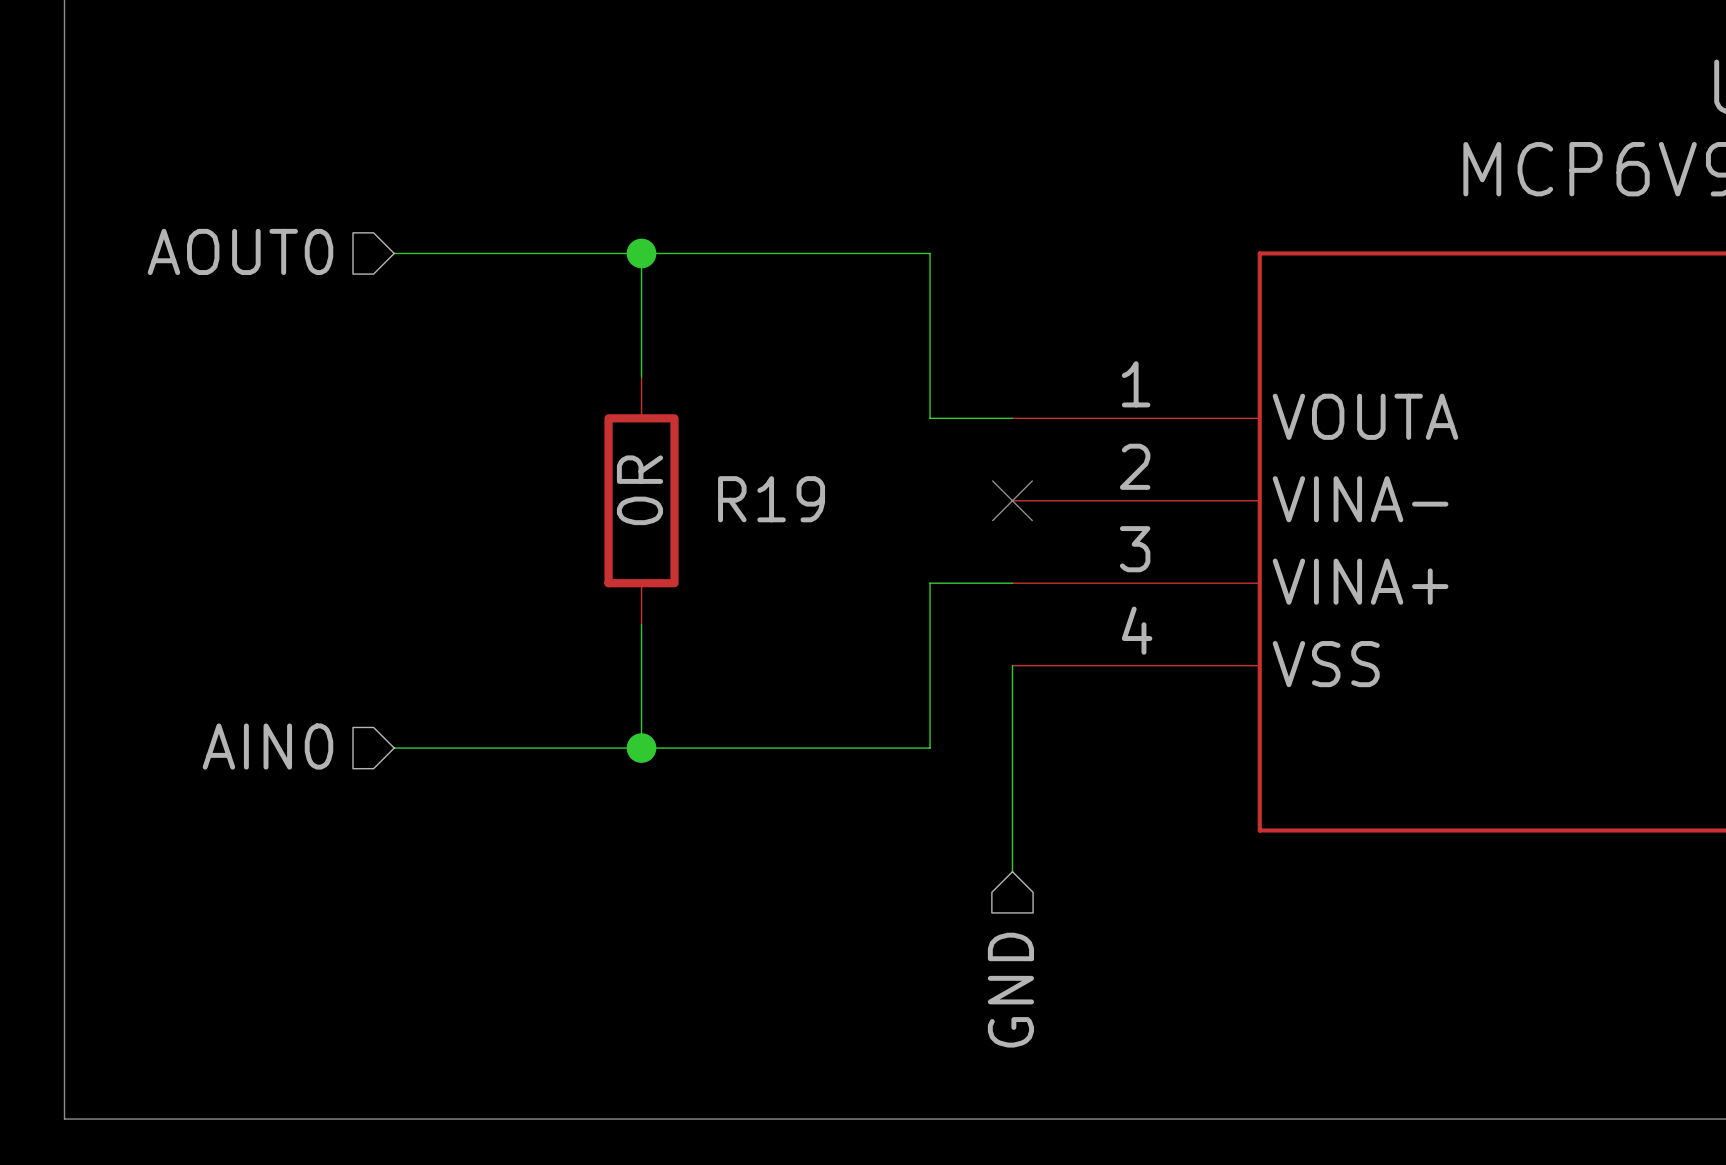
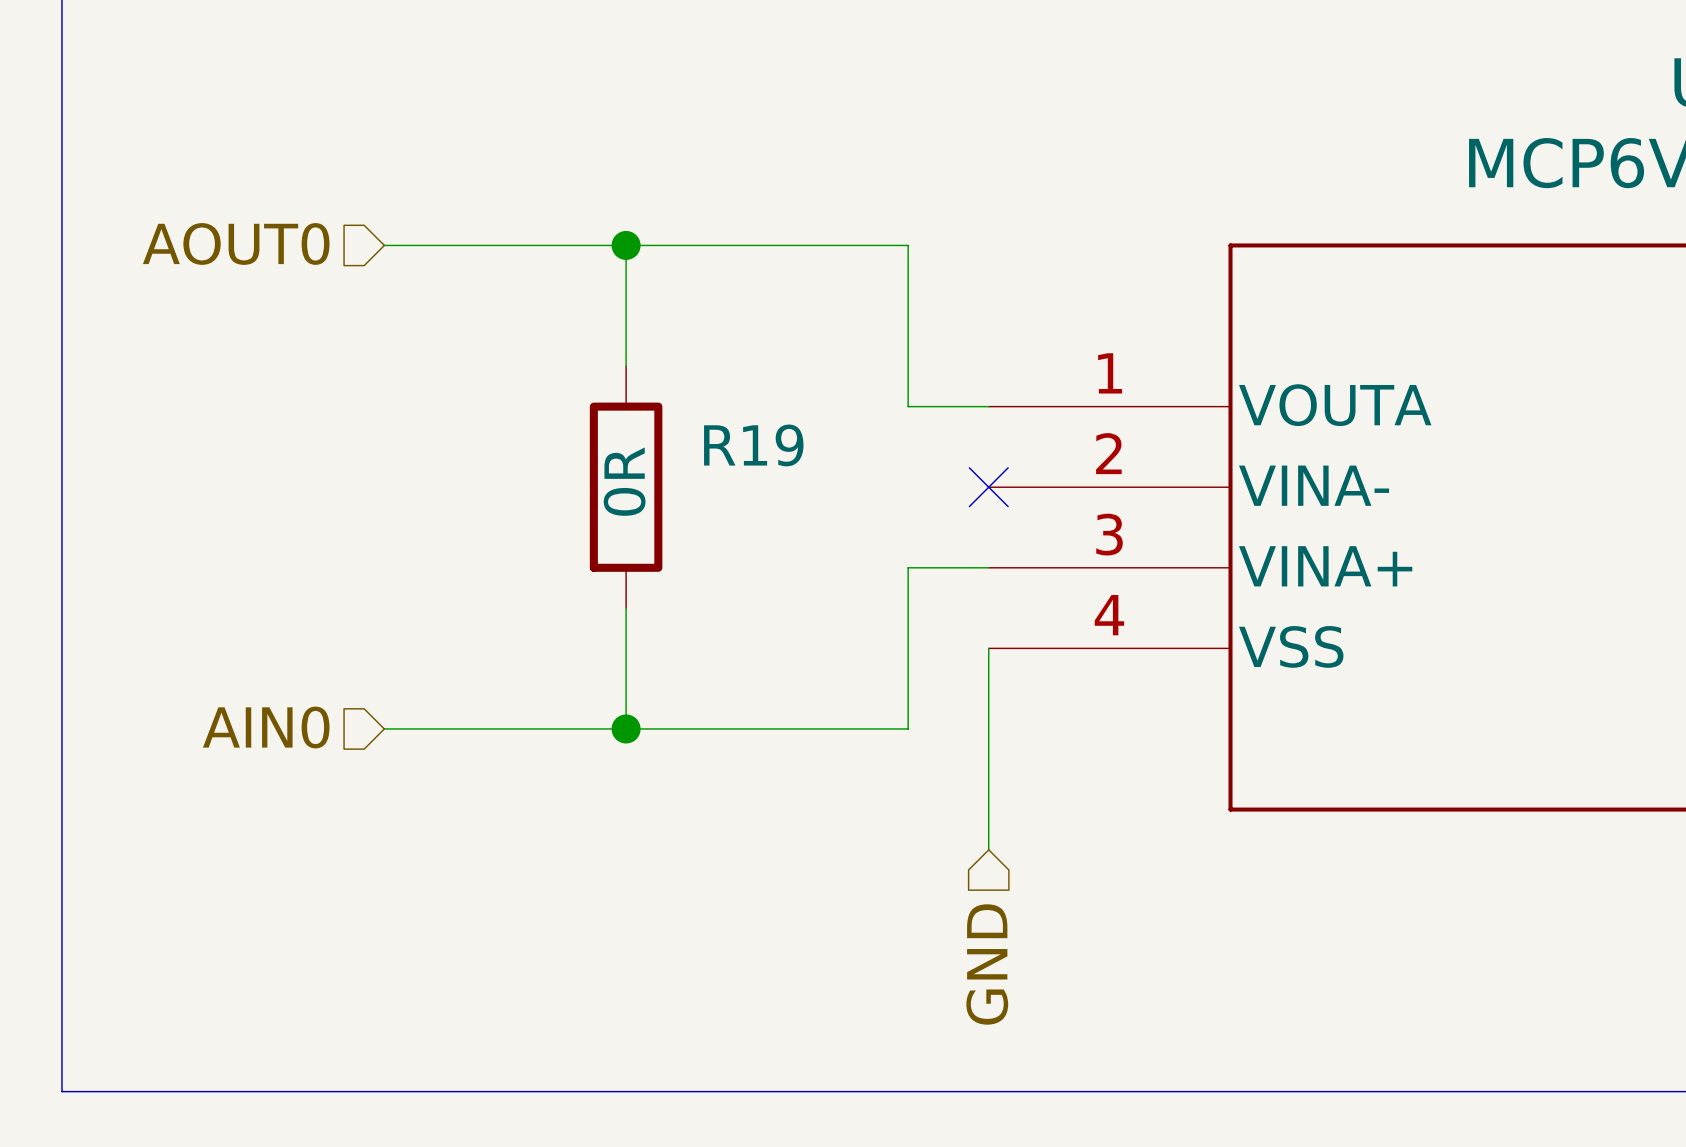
R19 name position: R19 (771, 499) -> R19 (753, 445)

